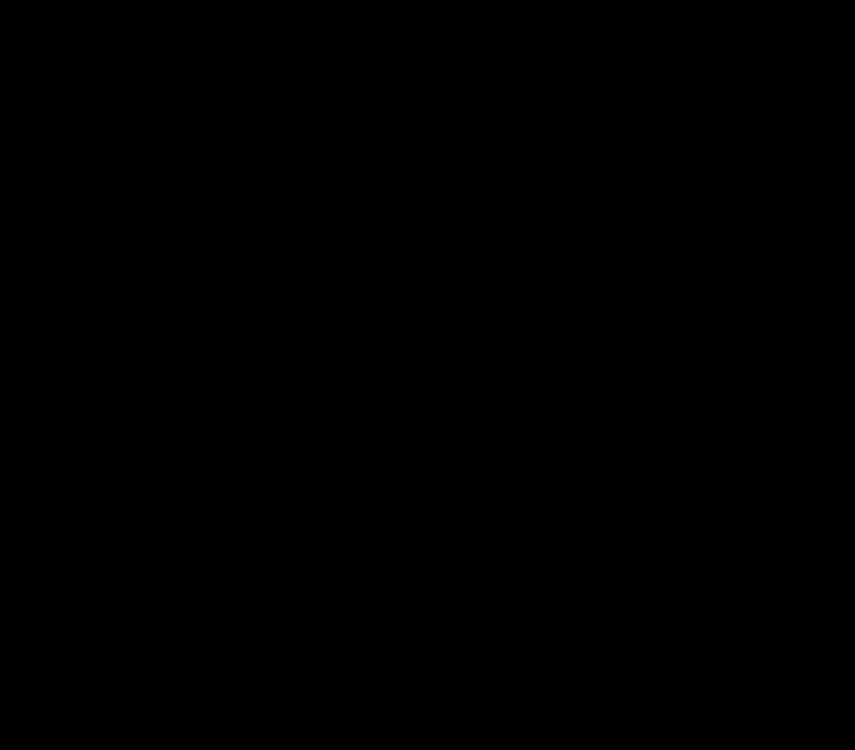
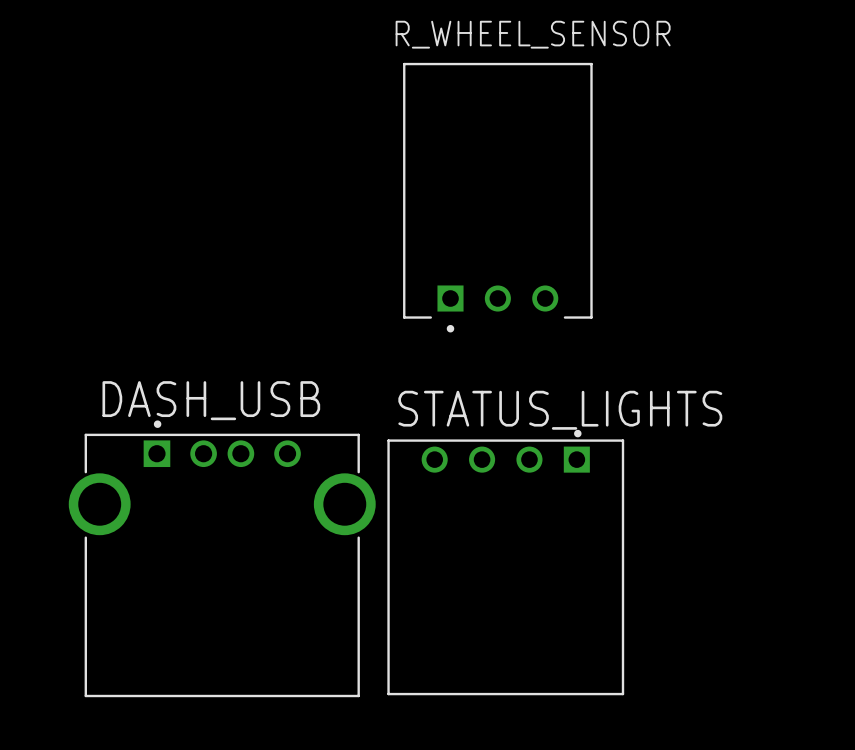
R_WHEEL_SENSOR: none -> (497, 197)
DASH_USB: none -> (222, 558)
STATUS_LIGHTS: none -> (505, 562)

